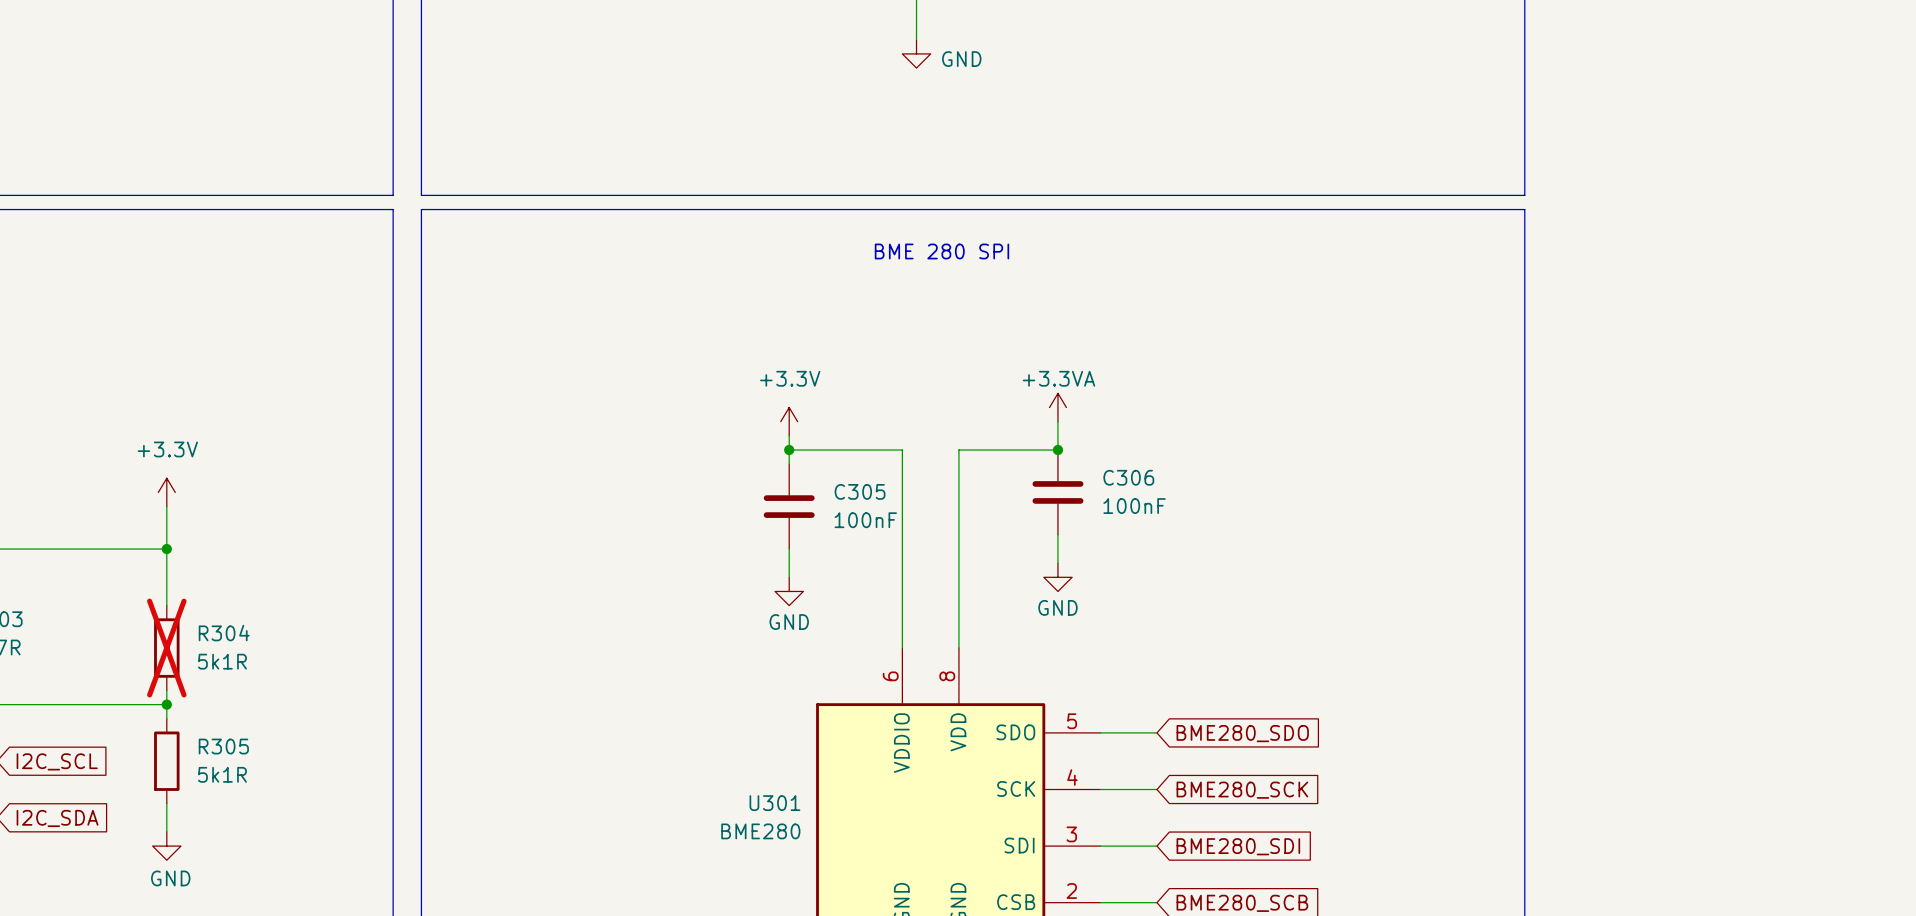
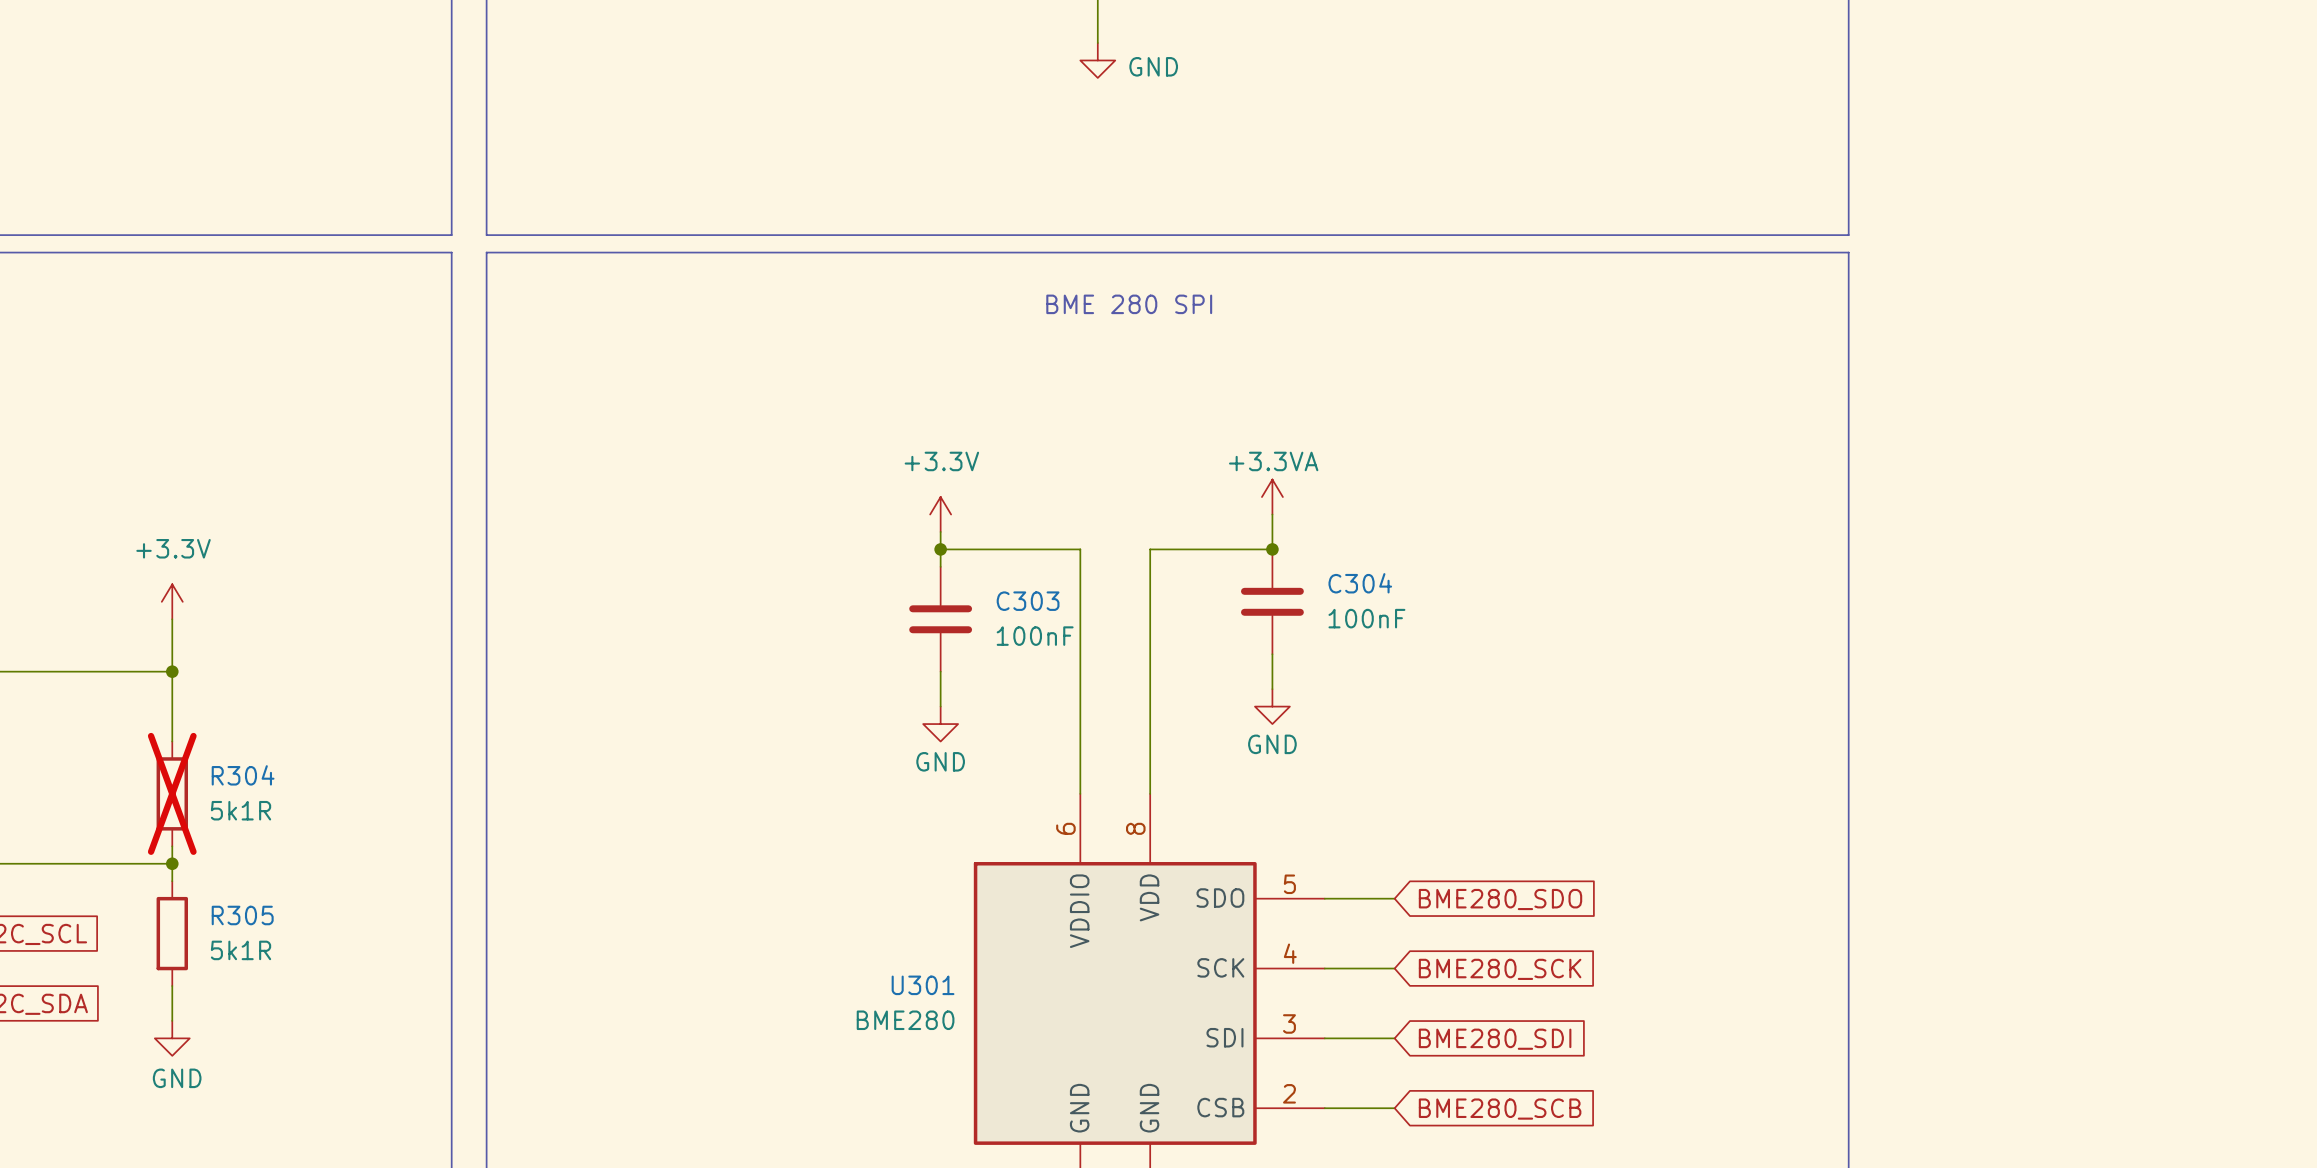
C306 name: C306 (1128, 477) -> C304 (1360, 583)
C305 name: C305 (860, 491) -> C303 (1028, 601)

